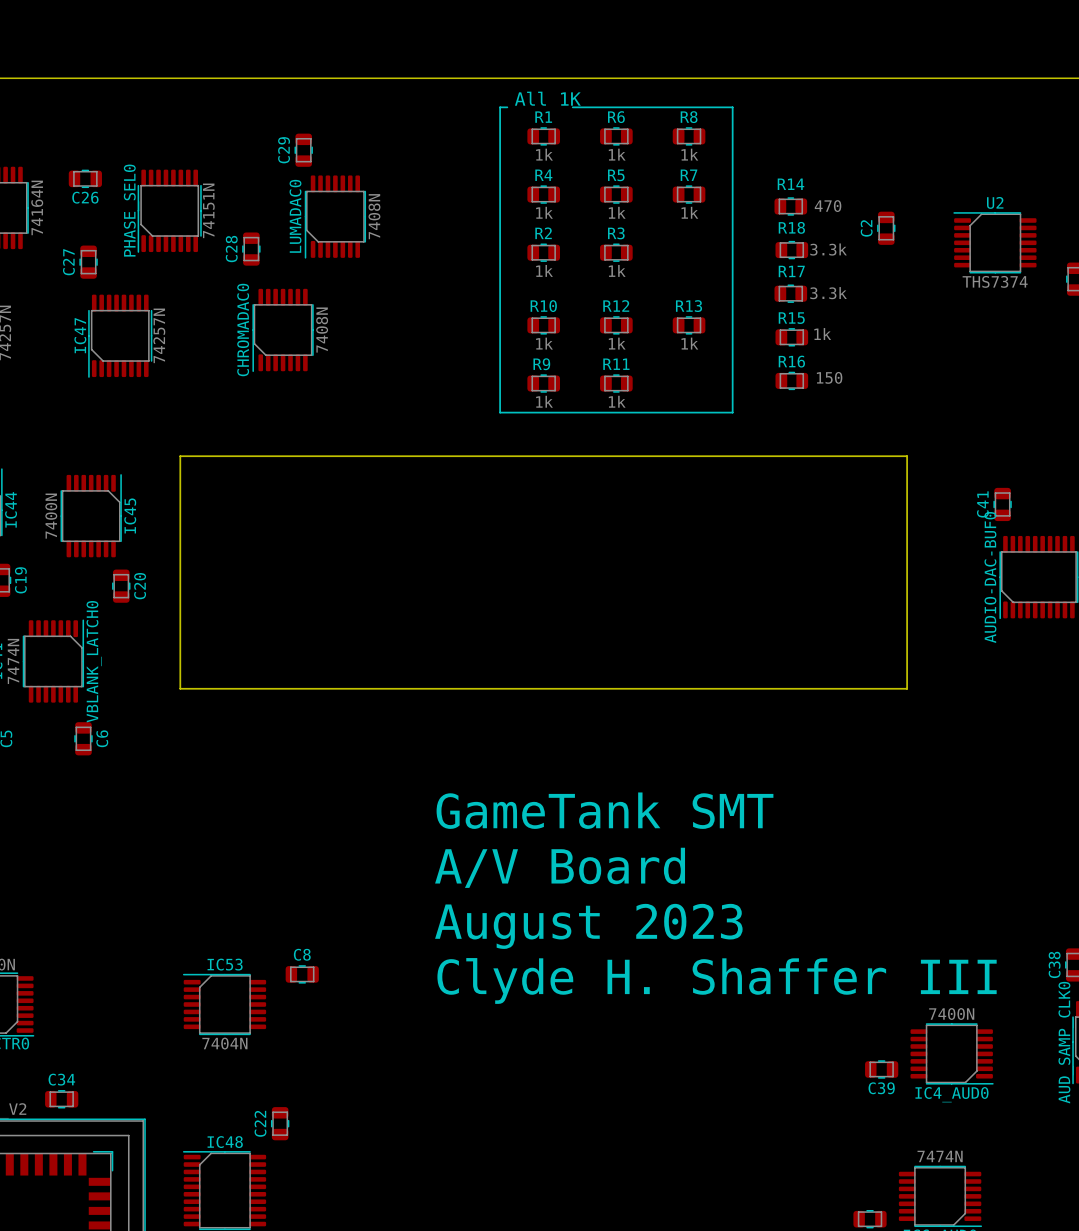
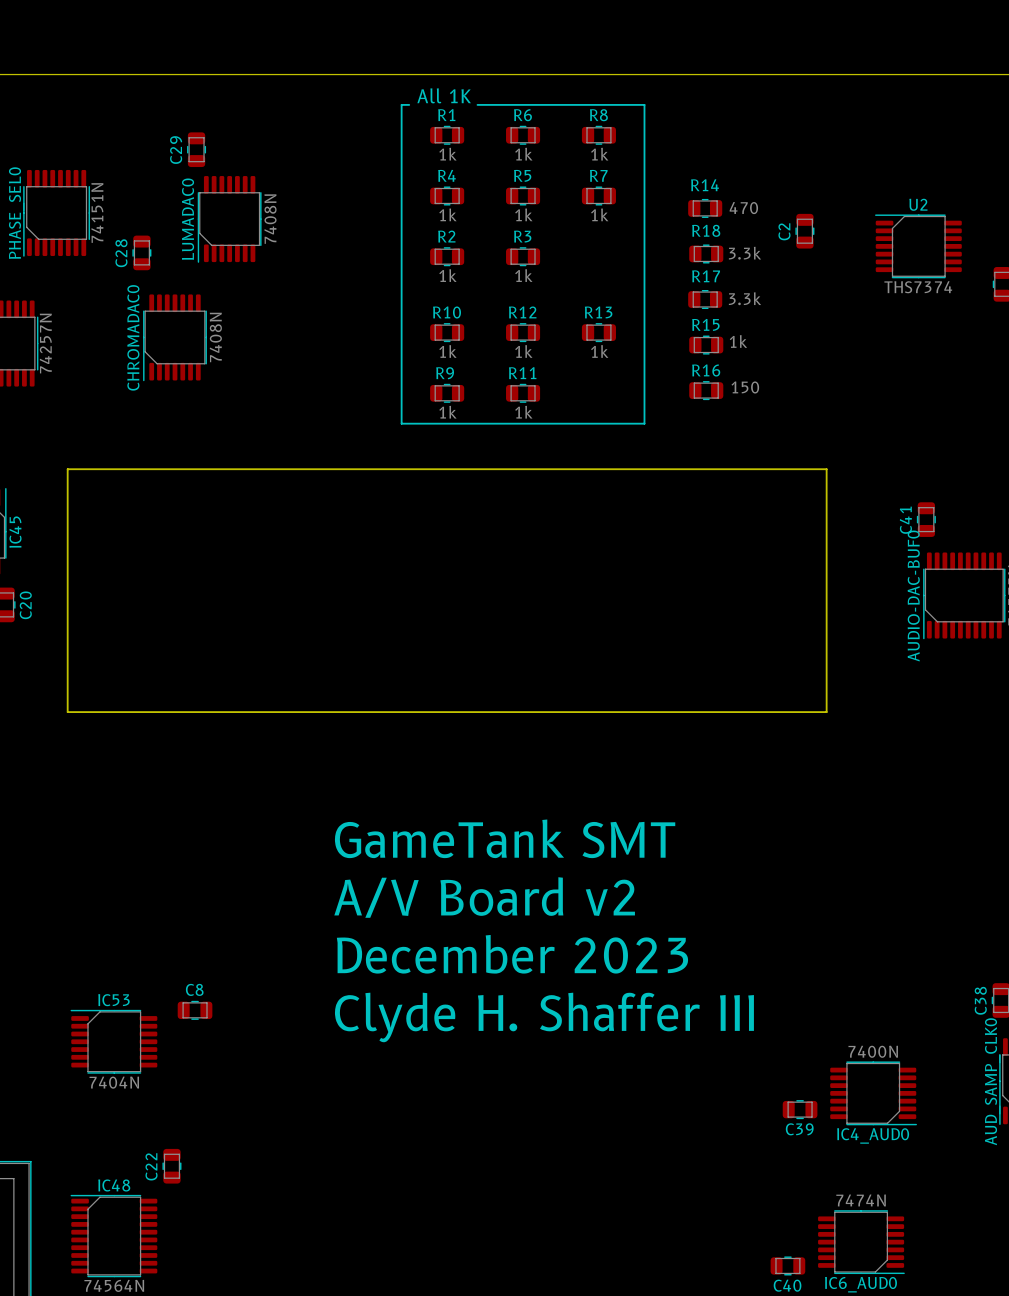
text: A/V Board (560, 867) -> A/V Board v2 (484, 897)
text: August 2023 (588, 926) -> December 2023 (512, 954)

